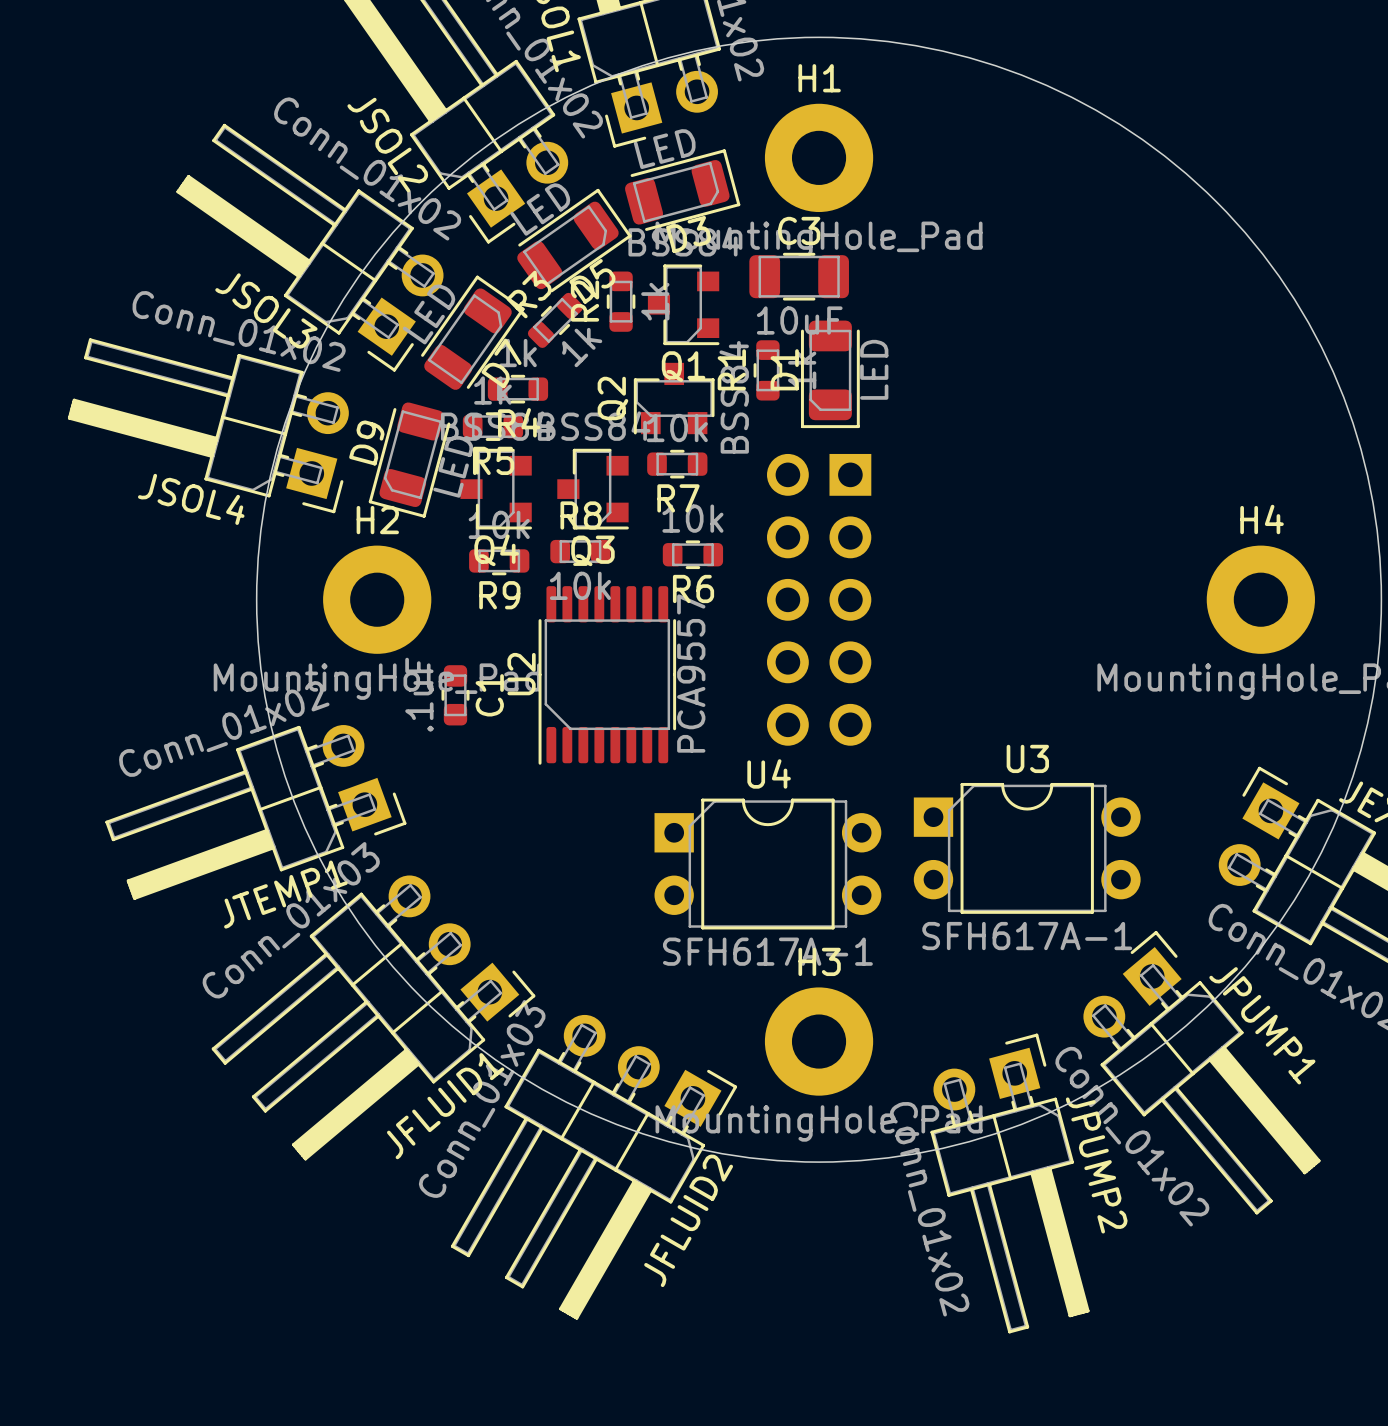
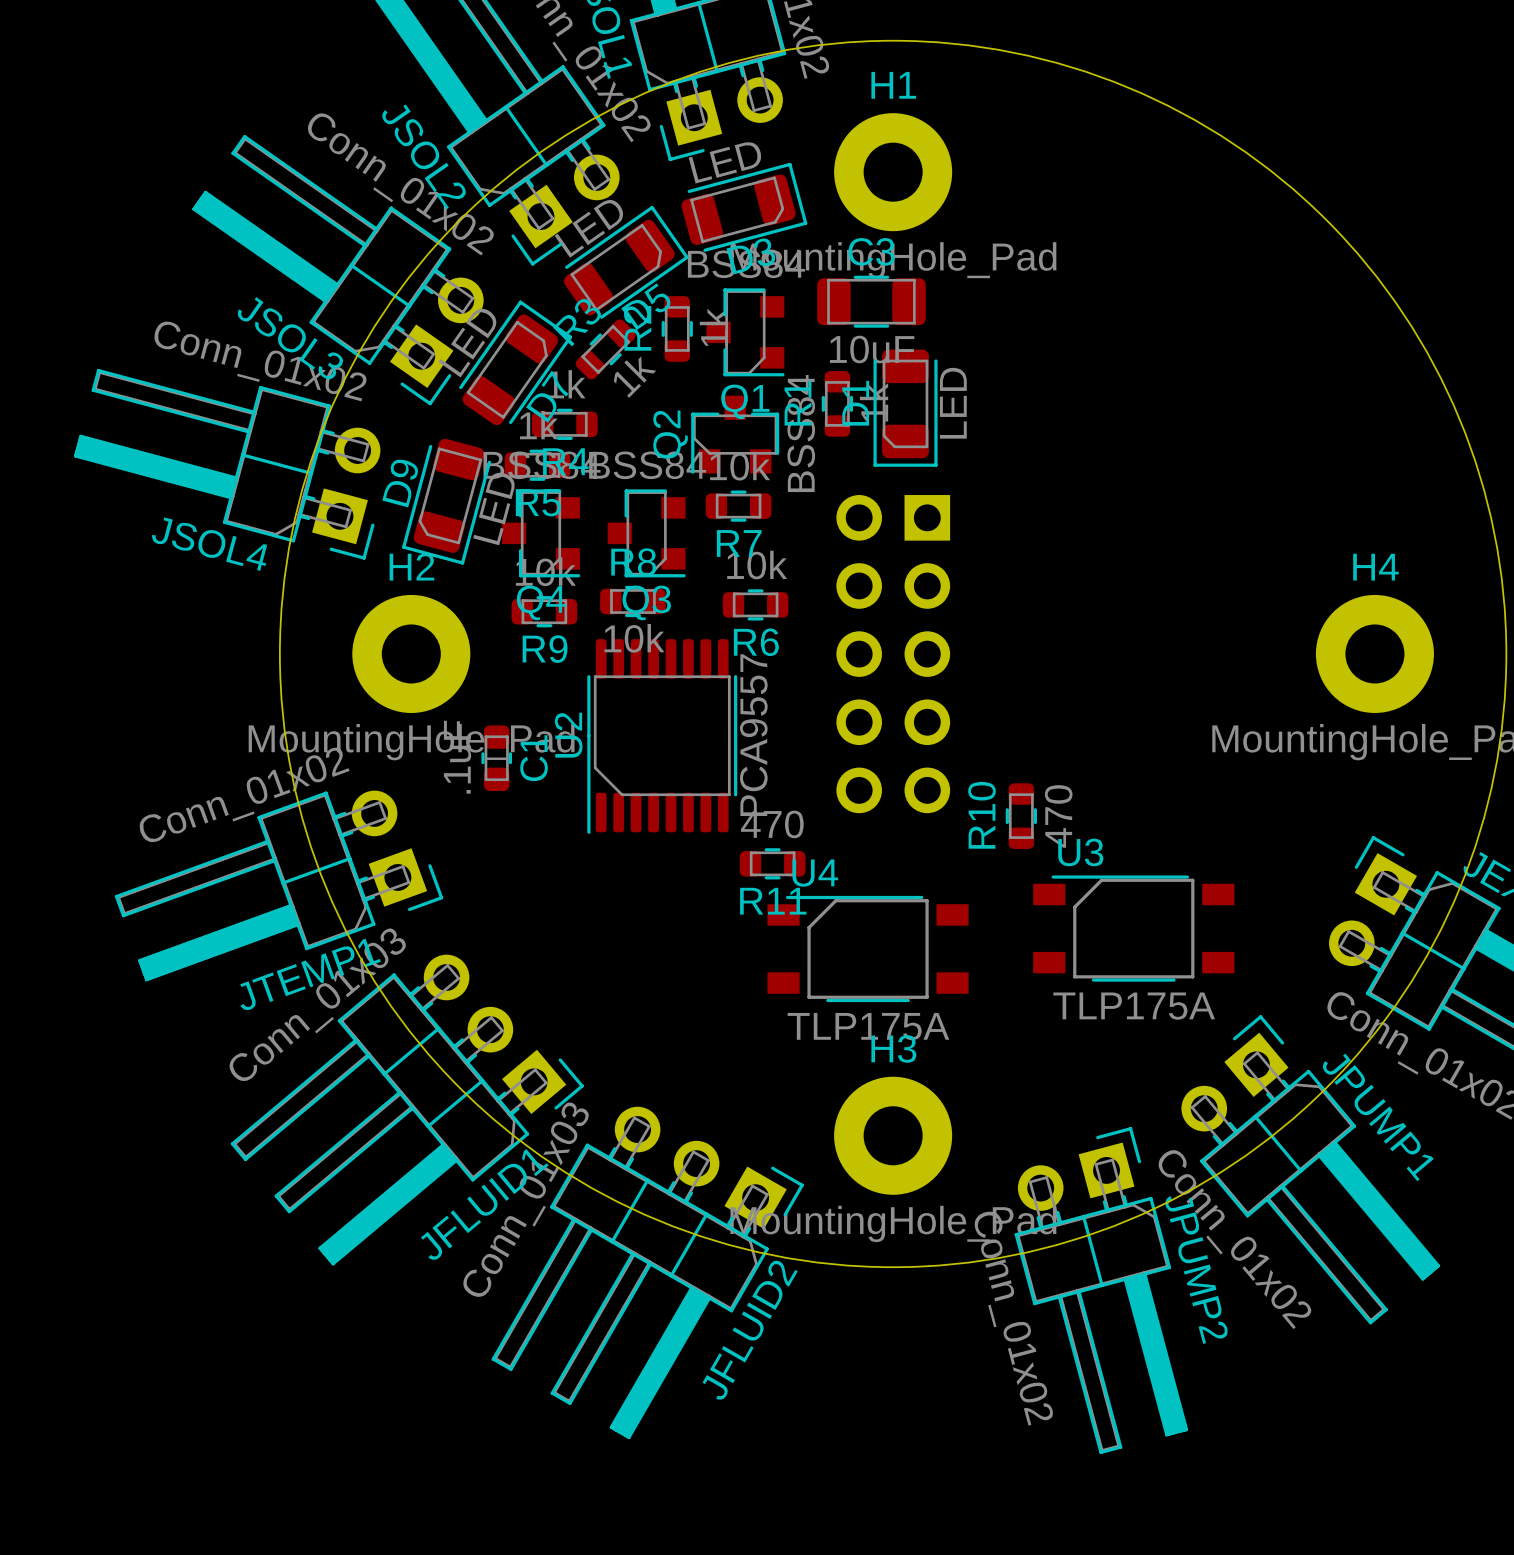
R10: none -> 470 (1021, 816)
U3 name position: U3 (1027, 758) -> U3 (1080, 852)
U4 name position: U4 (769, 773) -> U4 (815, 873)
U3 footprint: [913, 782, 1141, 914] -> [1033, 875, 1235, 982]
R11: none -> 470 (772, 863)
U4 footprint: [654, 798, 882, 930] -> [767, 895, 969, 1003]
U3 value: SFH617A-1 (1027, 936) -> TLP175A (1134, 1006)
U4 value: SFH617A-1 (767, 951) -> TLP175A (868, 1026)

